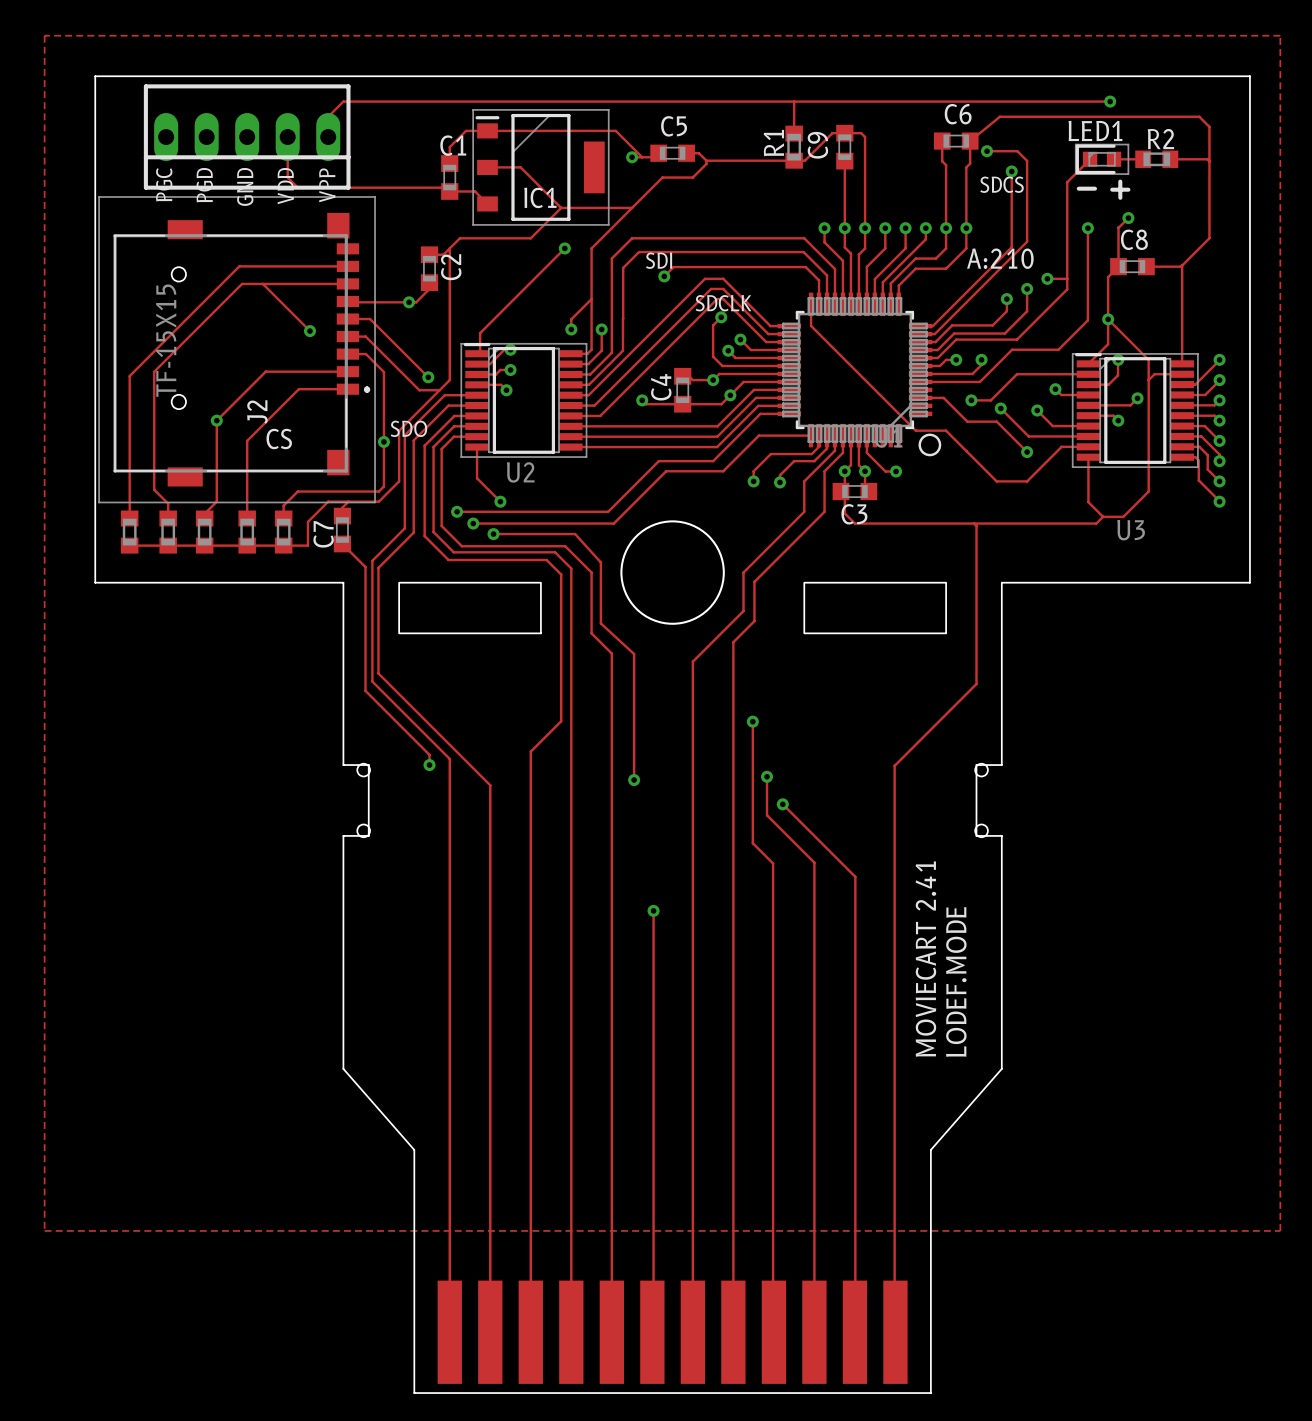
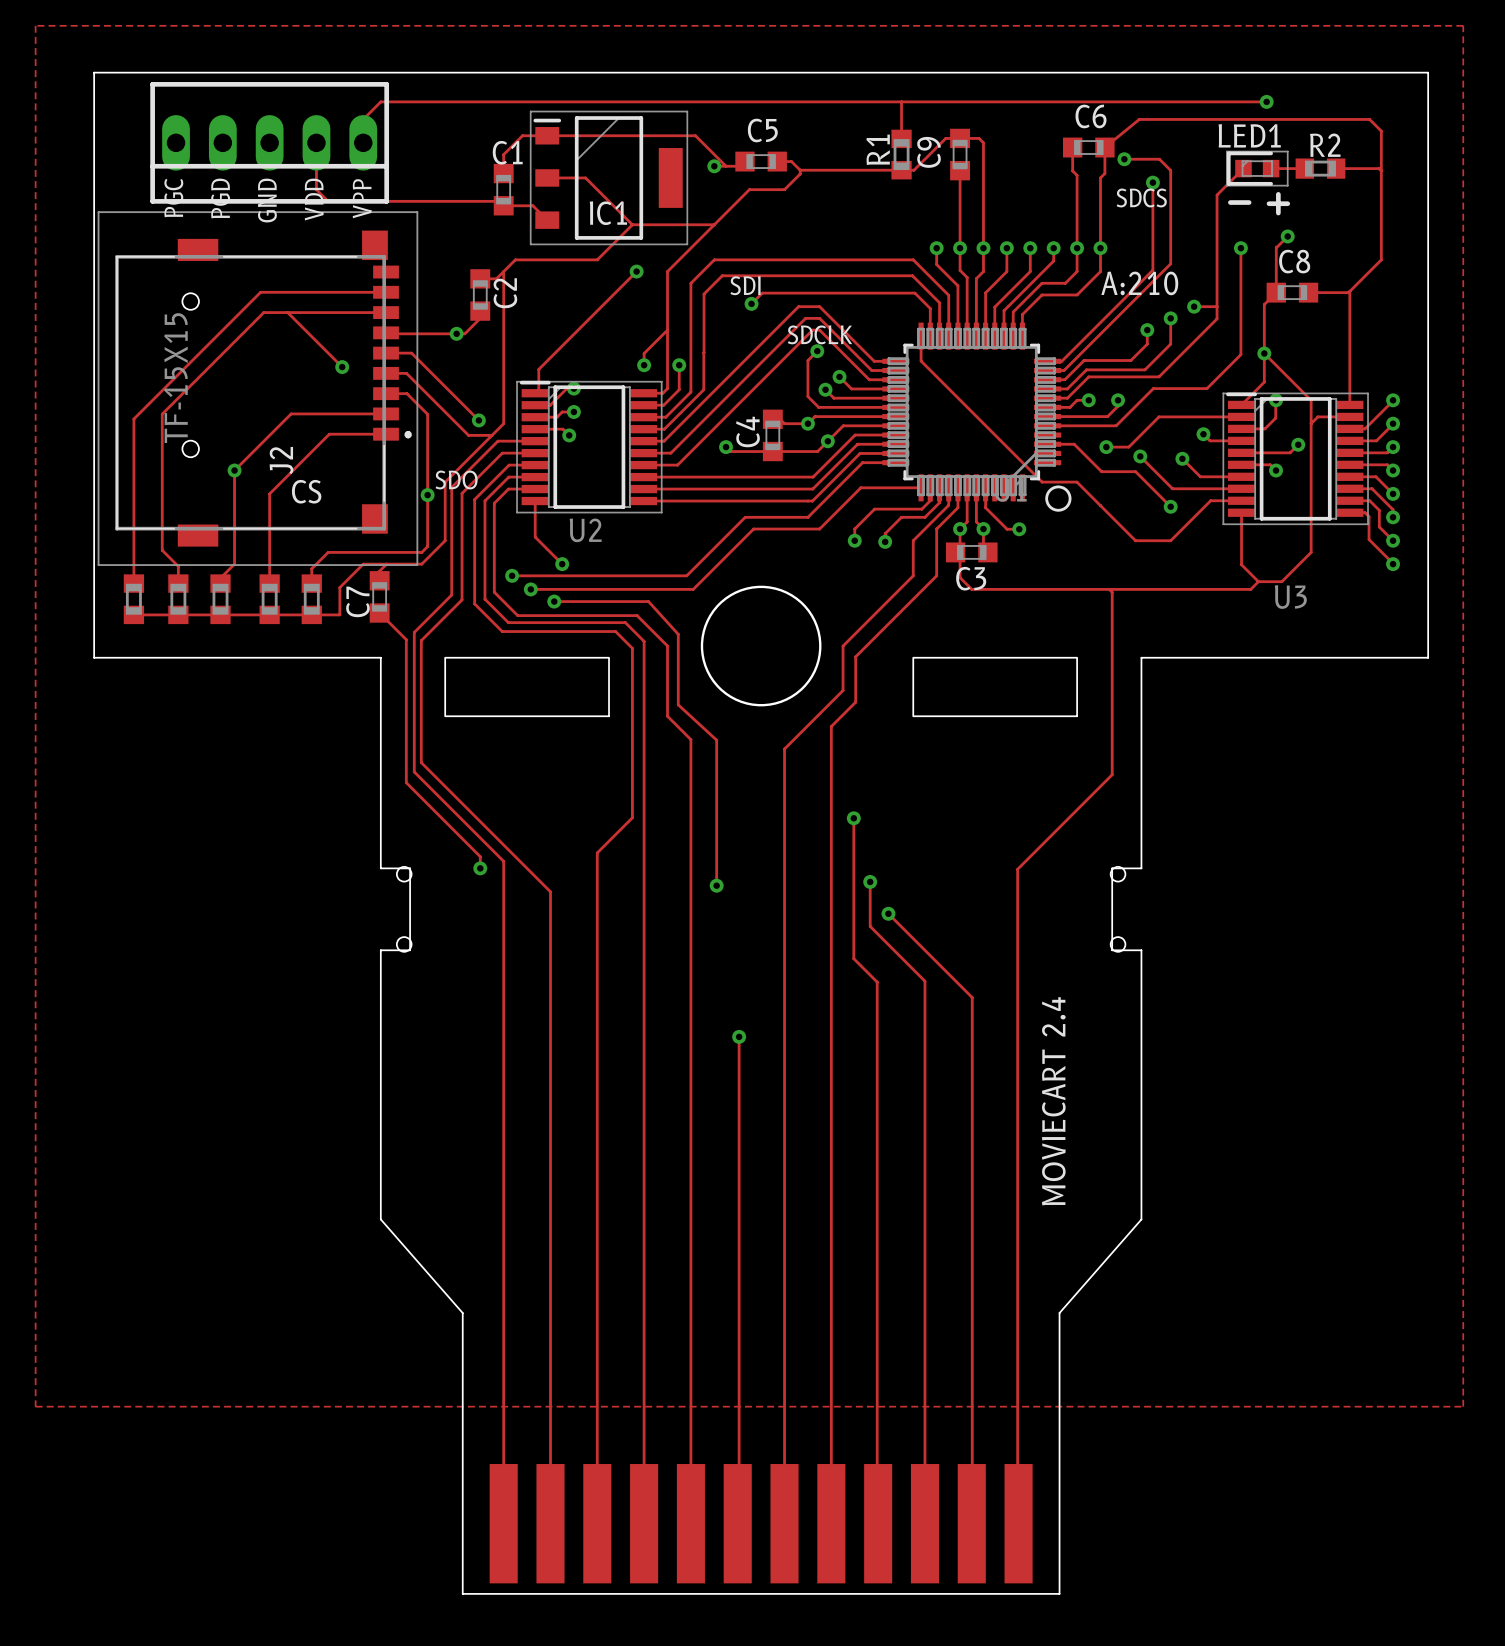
text: MOVIECART 2.41 (925, 959) -> MOVIECART 2.4 (1053, 1101)
text: LODEF.MODE (956, 981) -> none

